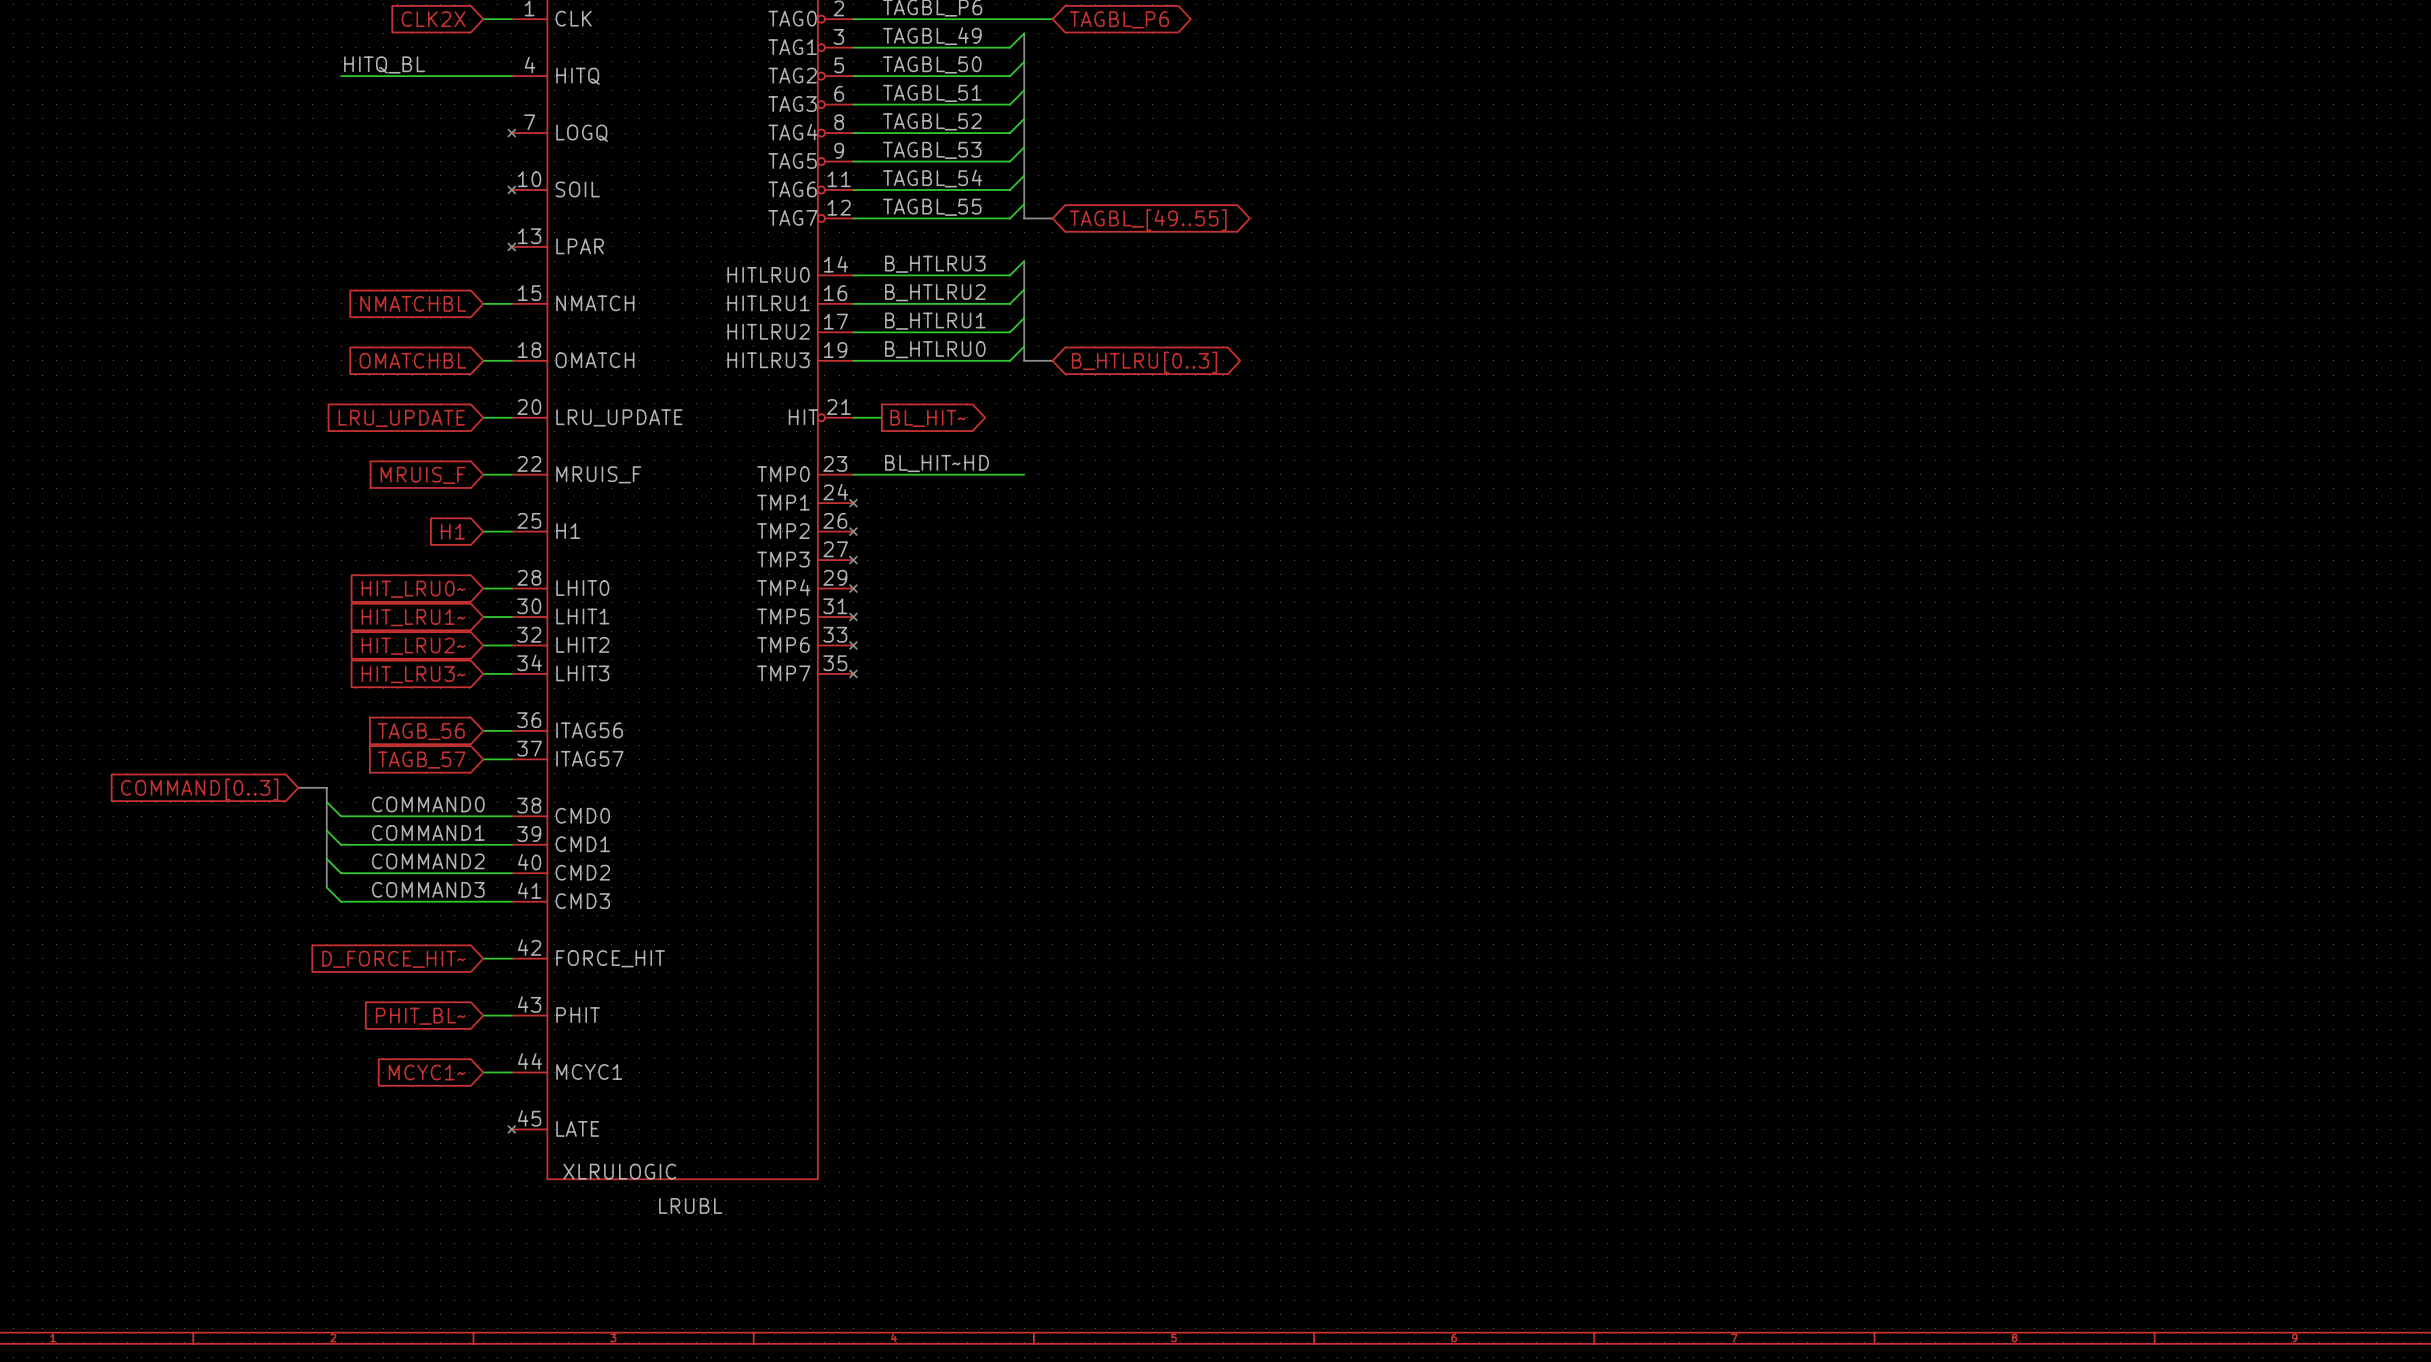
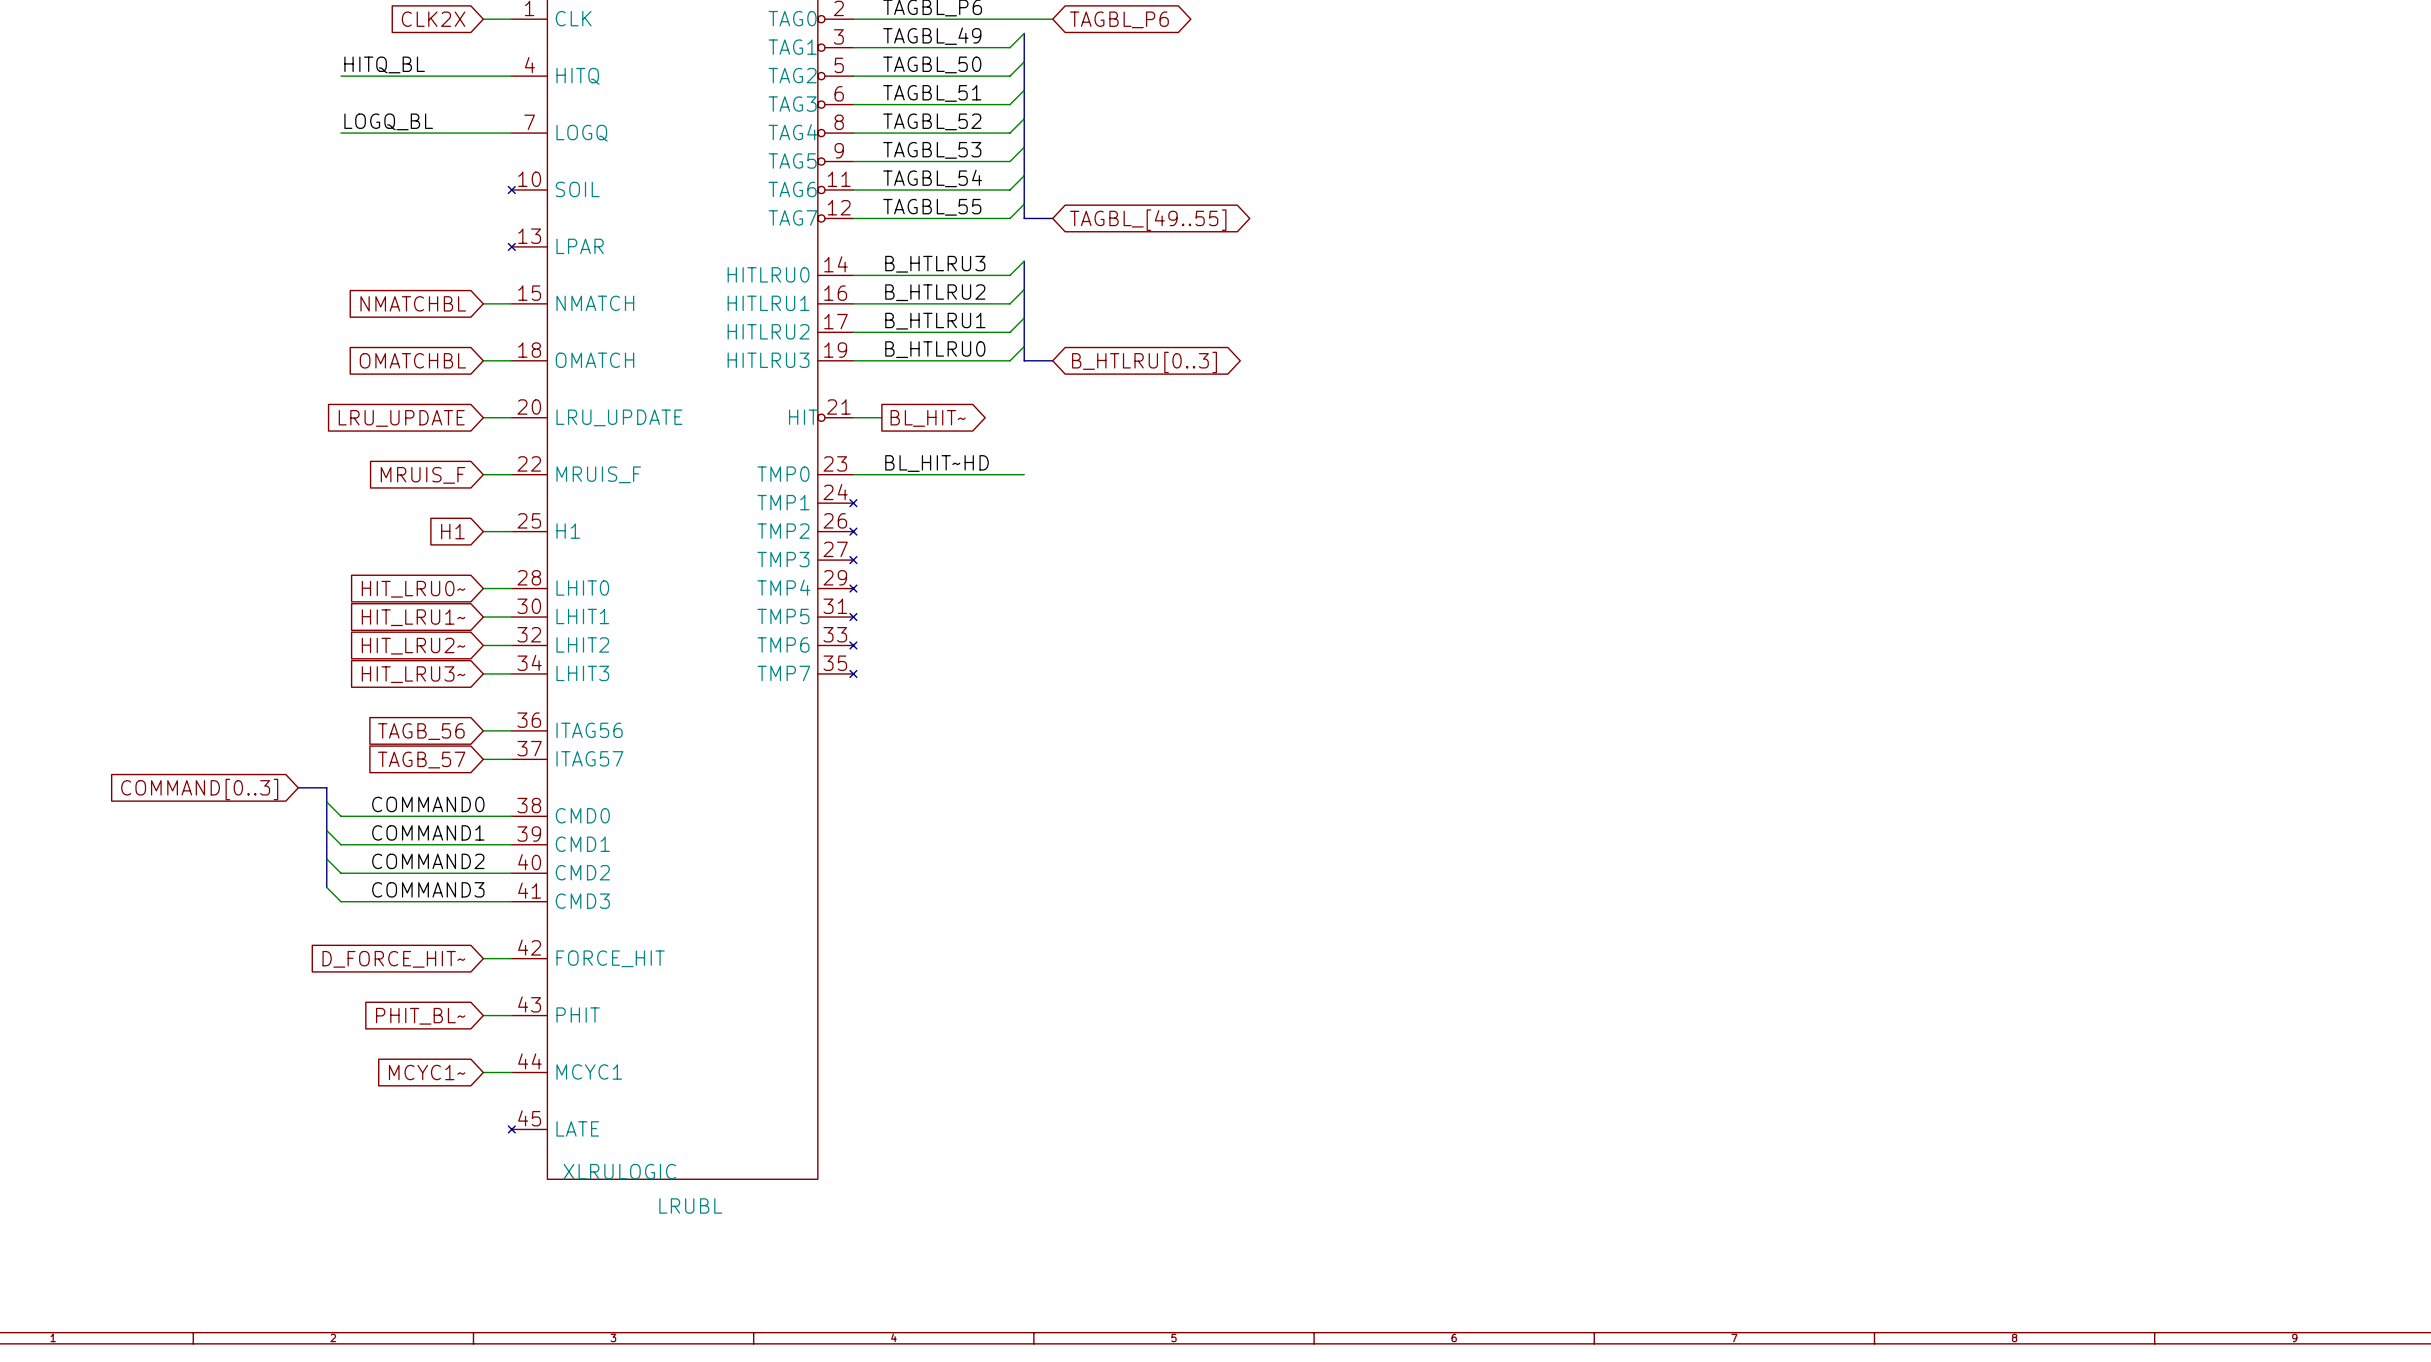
label: none -> LOGQ_BL (388, 121)
wire: none -> (341, 133) (511, 133)
no-connect mark: (511, 133) -> none

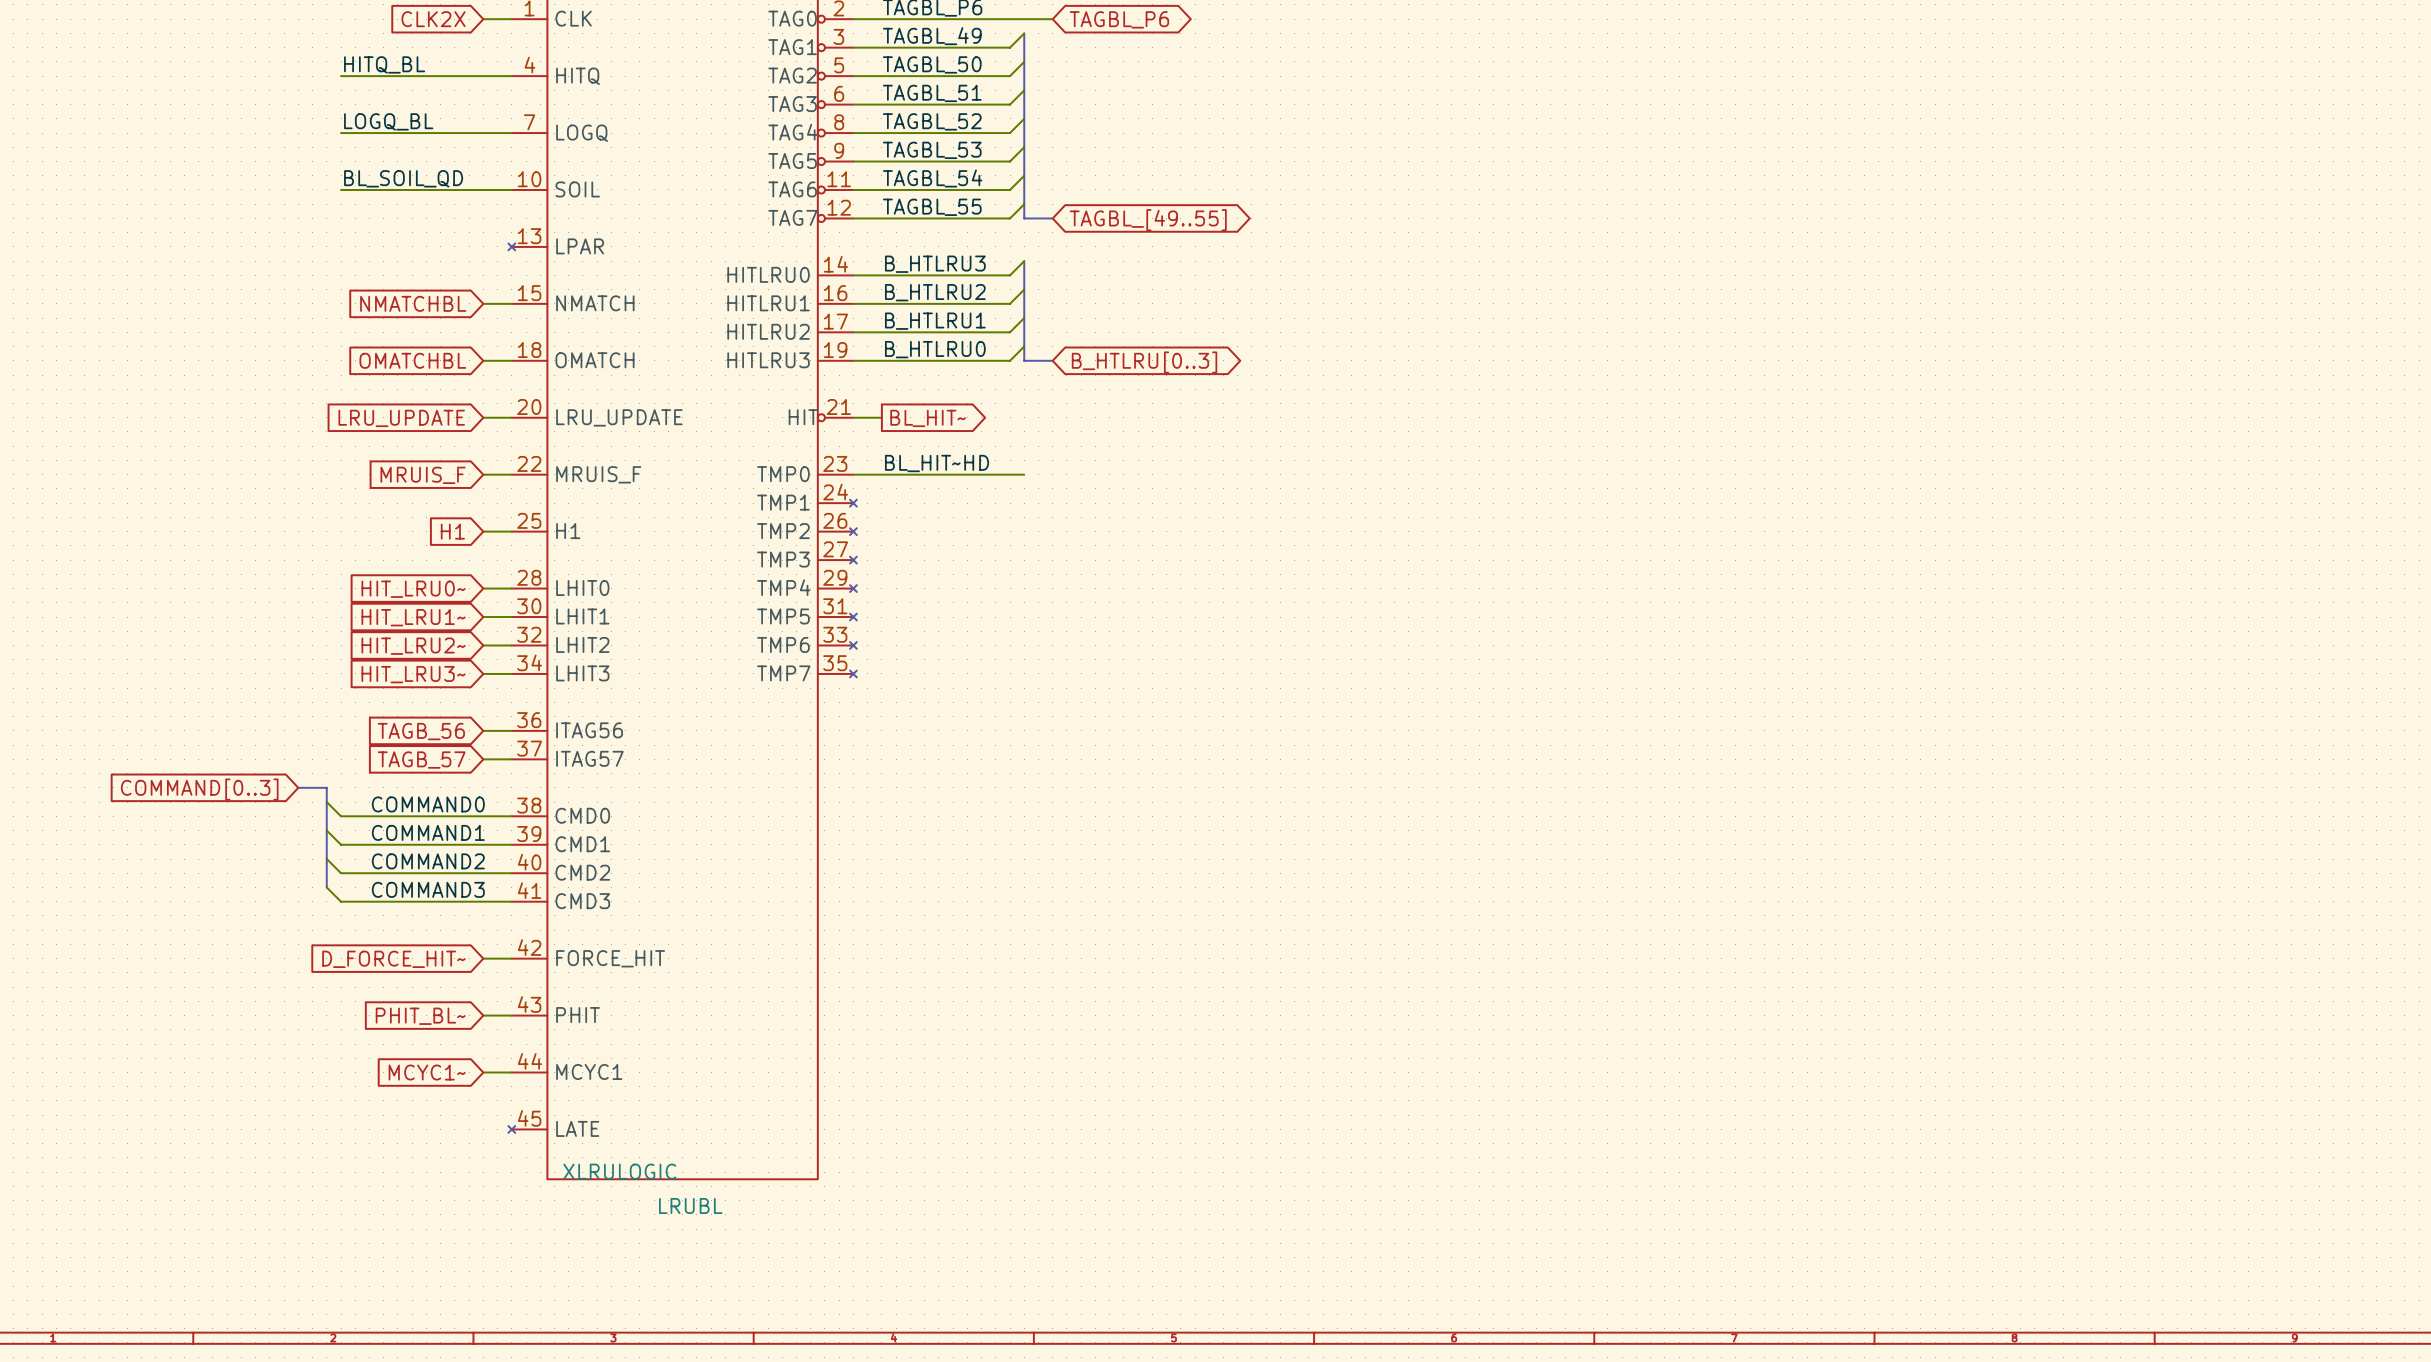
label: none -> BL_SOIL_QD (403, 178)
wire: none -> (341, 189) (511, 189)
no-connect mark: (511, 189) -> none

